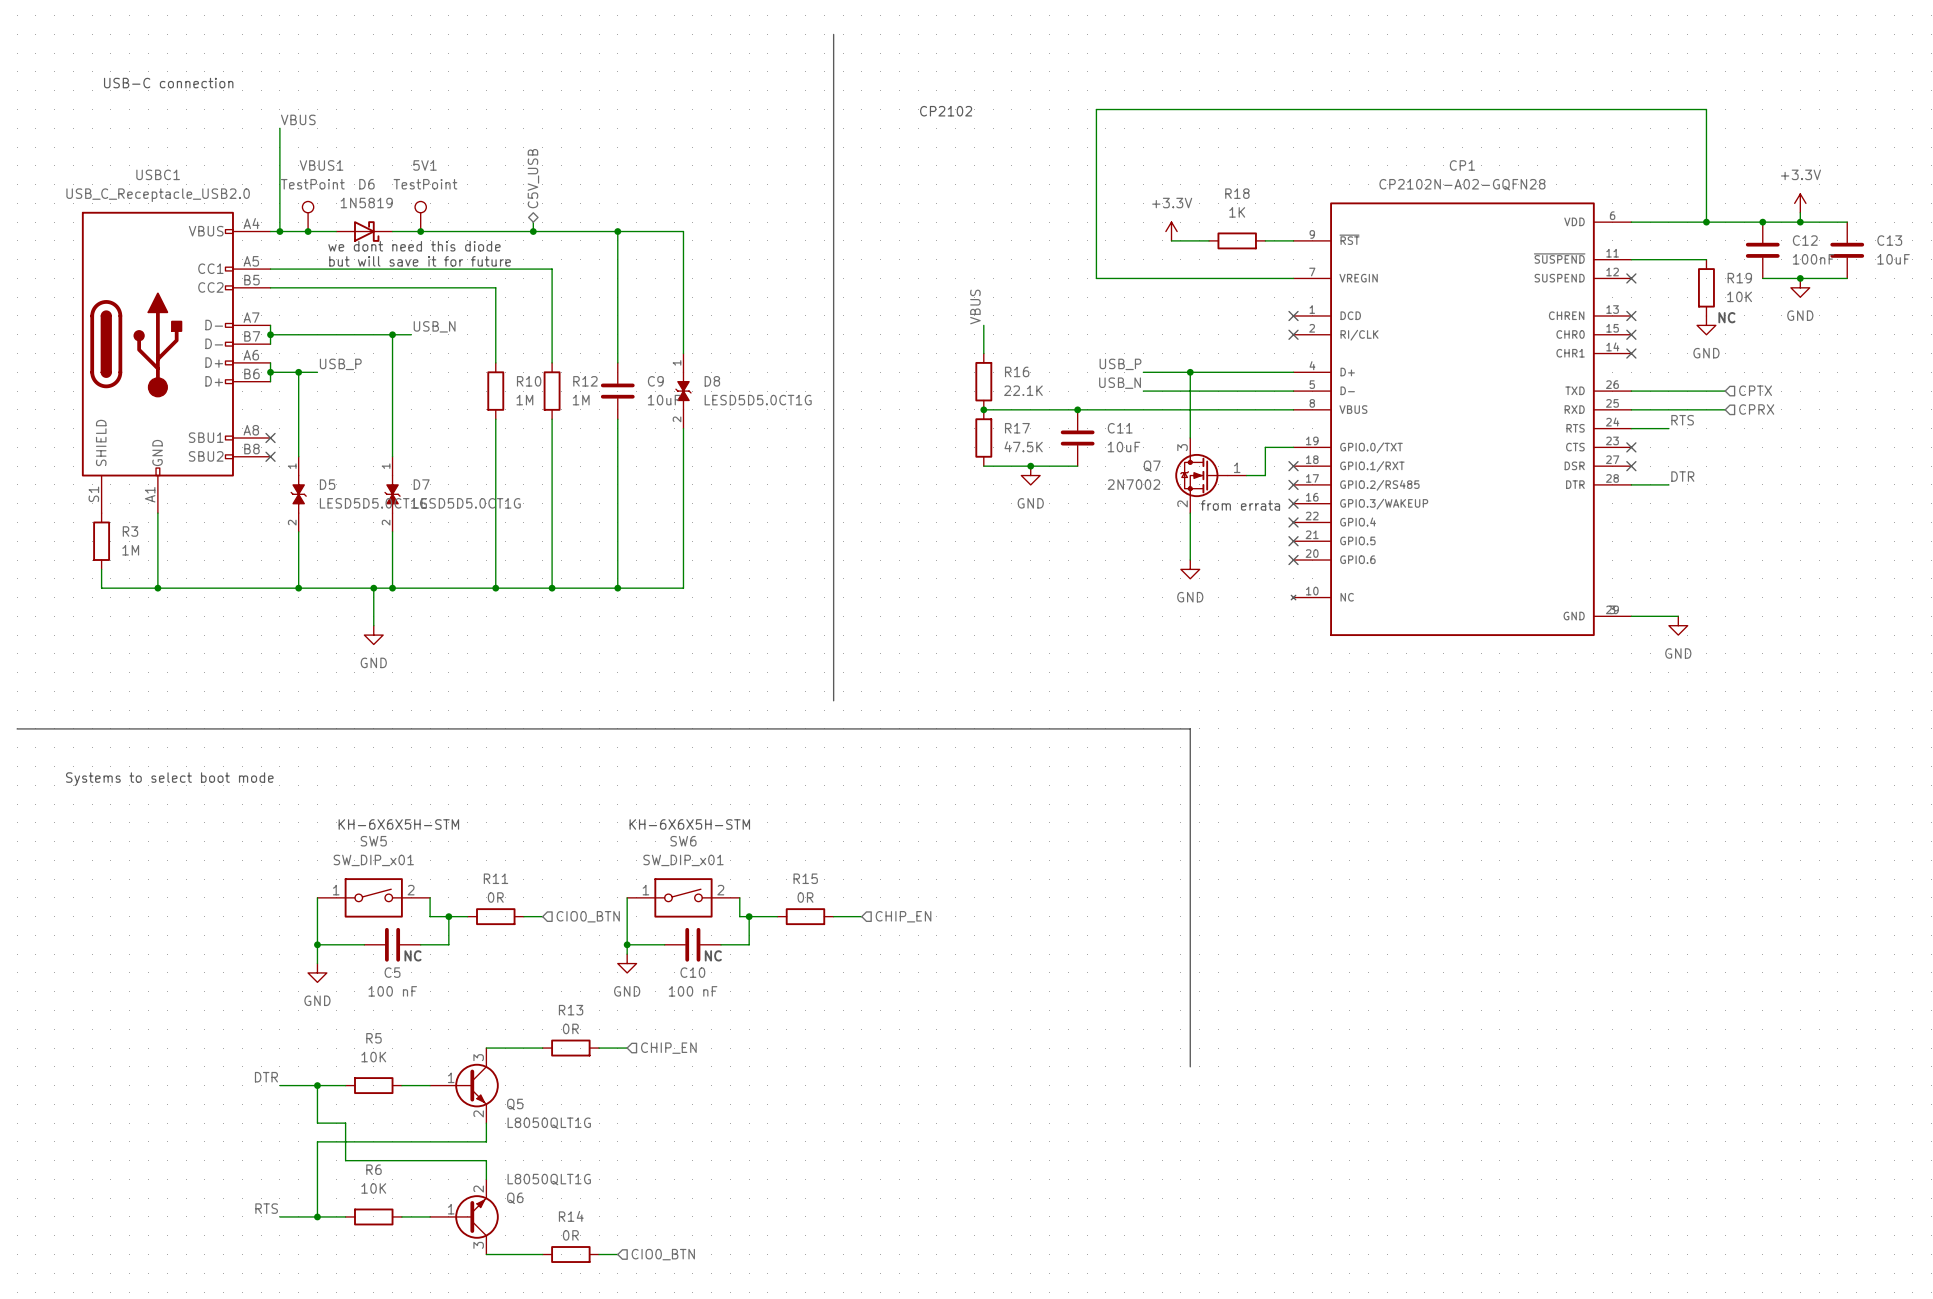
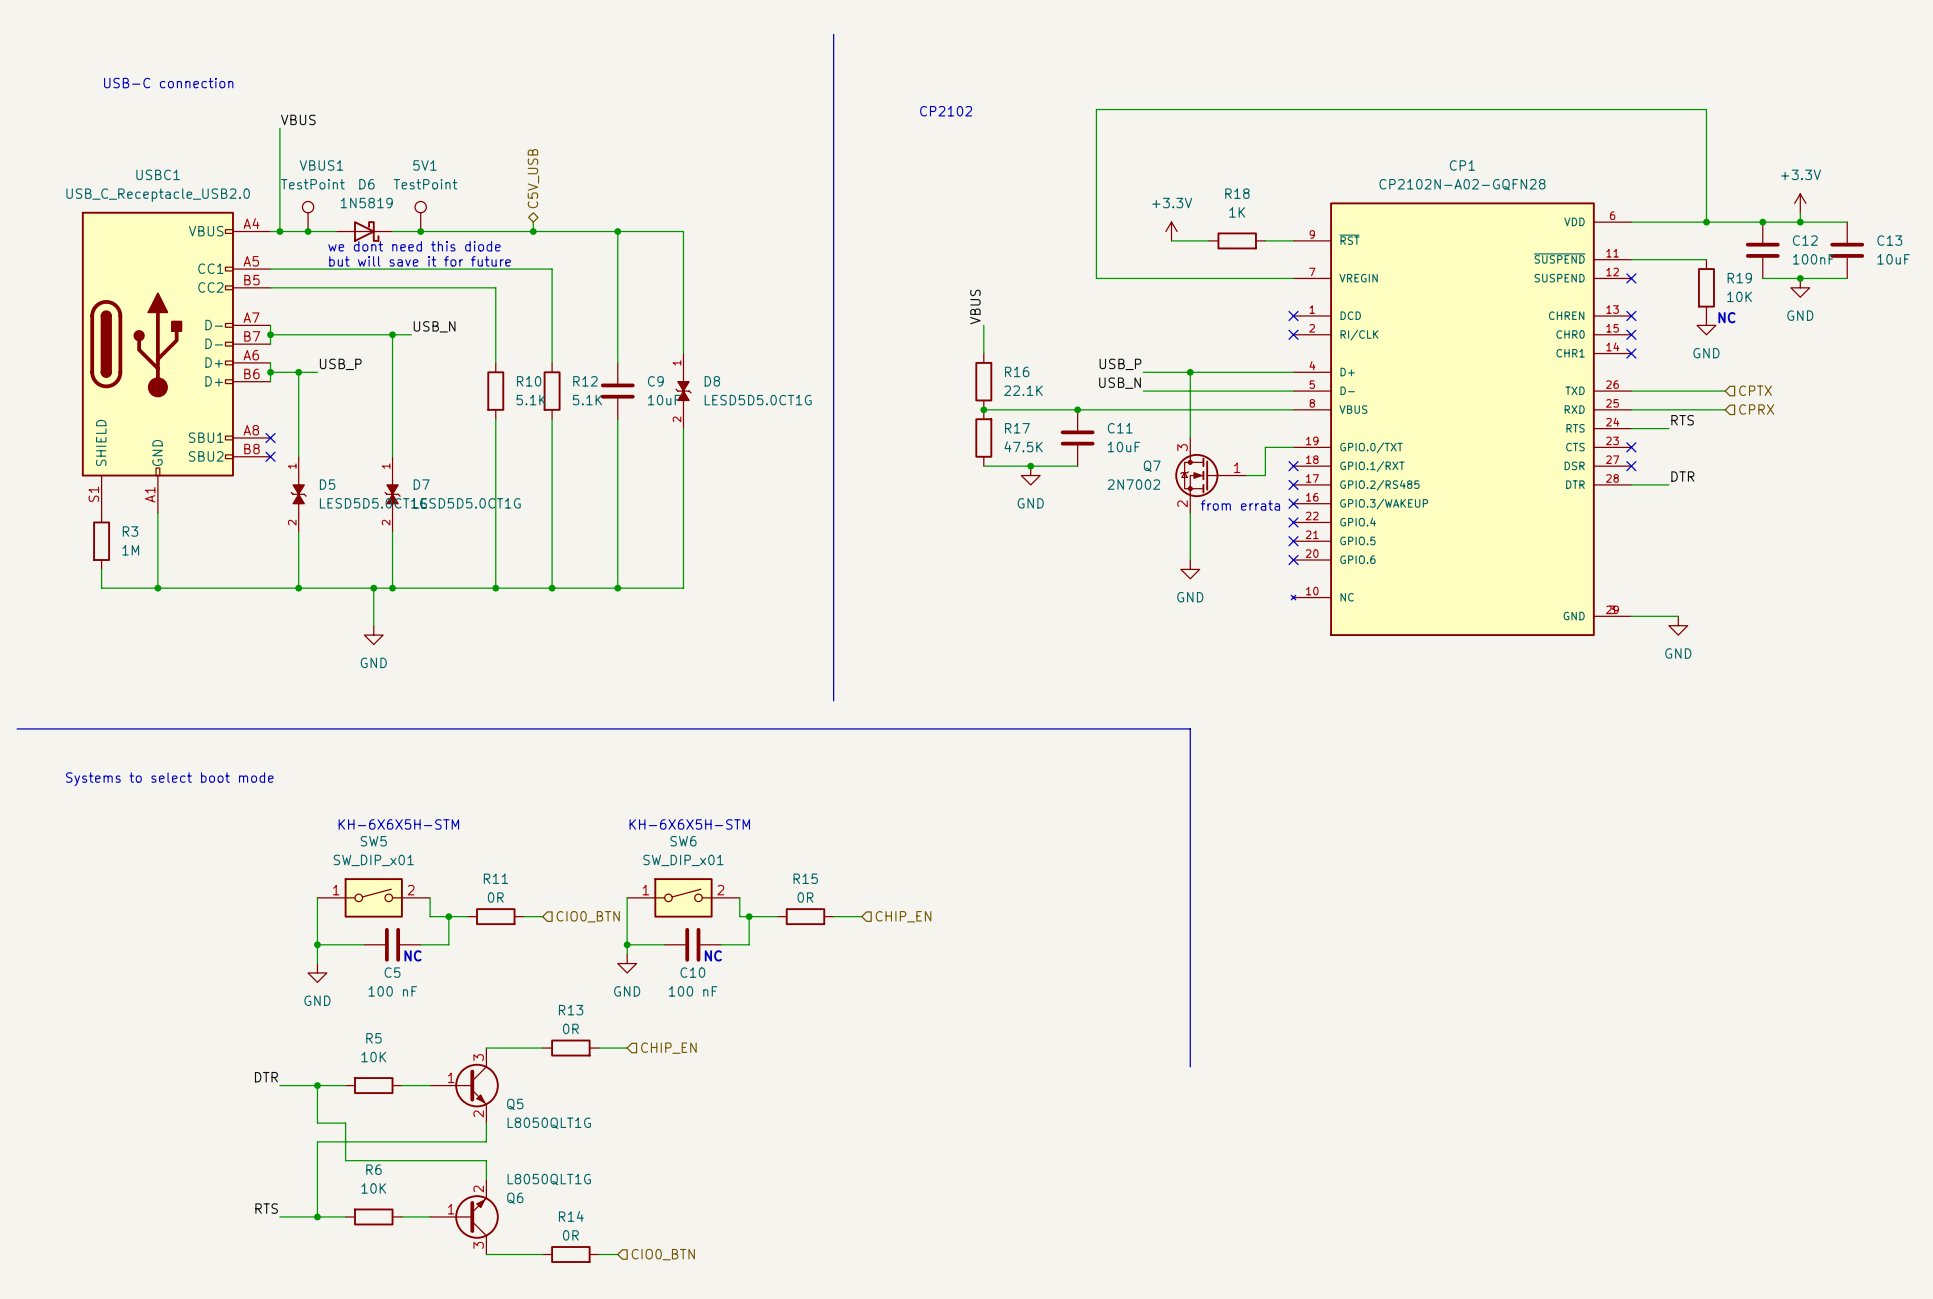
R10 value: 1M (524, 400) -> 5.1K (531, 400)
R12 value: 1M (581, 400) -> 5.1K (587, 400)

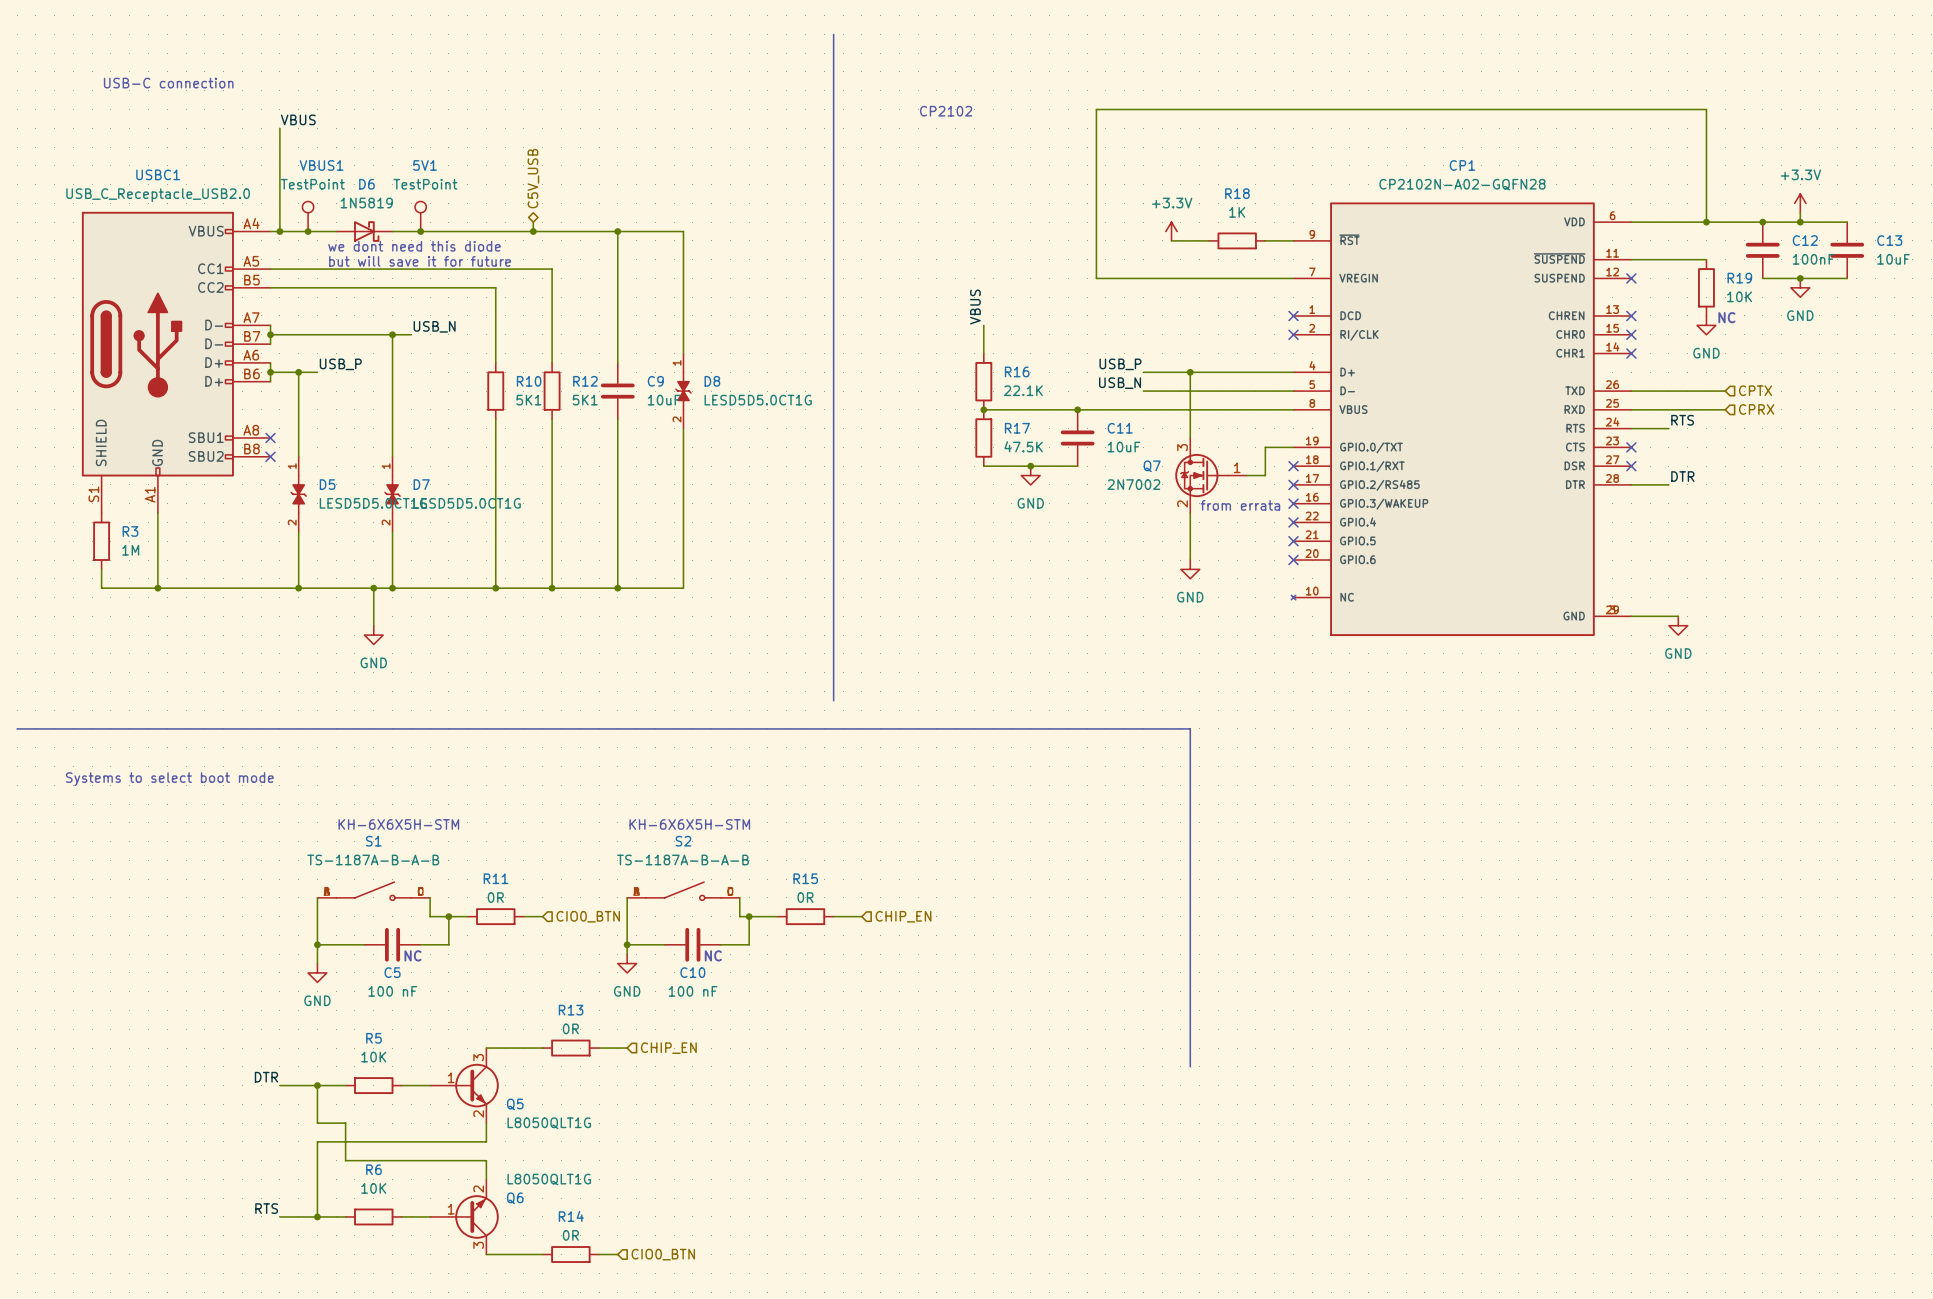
R10 value: 5.1K (531, 400) -> 5K1 (528, 400)
R12 value: 5.1K (587, 400) -> 5K1 (585, 400)
S1: none -> TS-1187A-B-A-B (373, 891)
S2: none -> TS-1187A-B-A-B (683, 891)
SW5: SW_DIP_x01 (373, 897) -> none
SW6: SW_DIP_x01 (683, 897) -> none

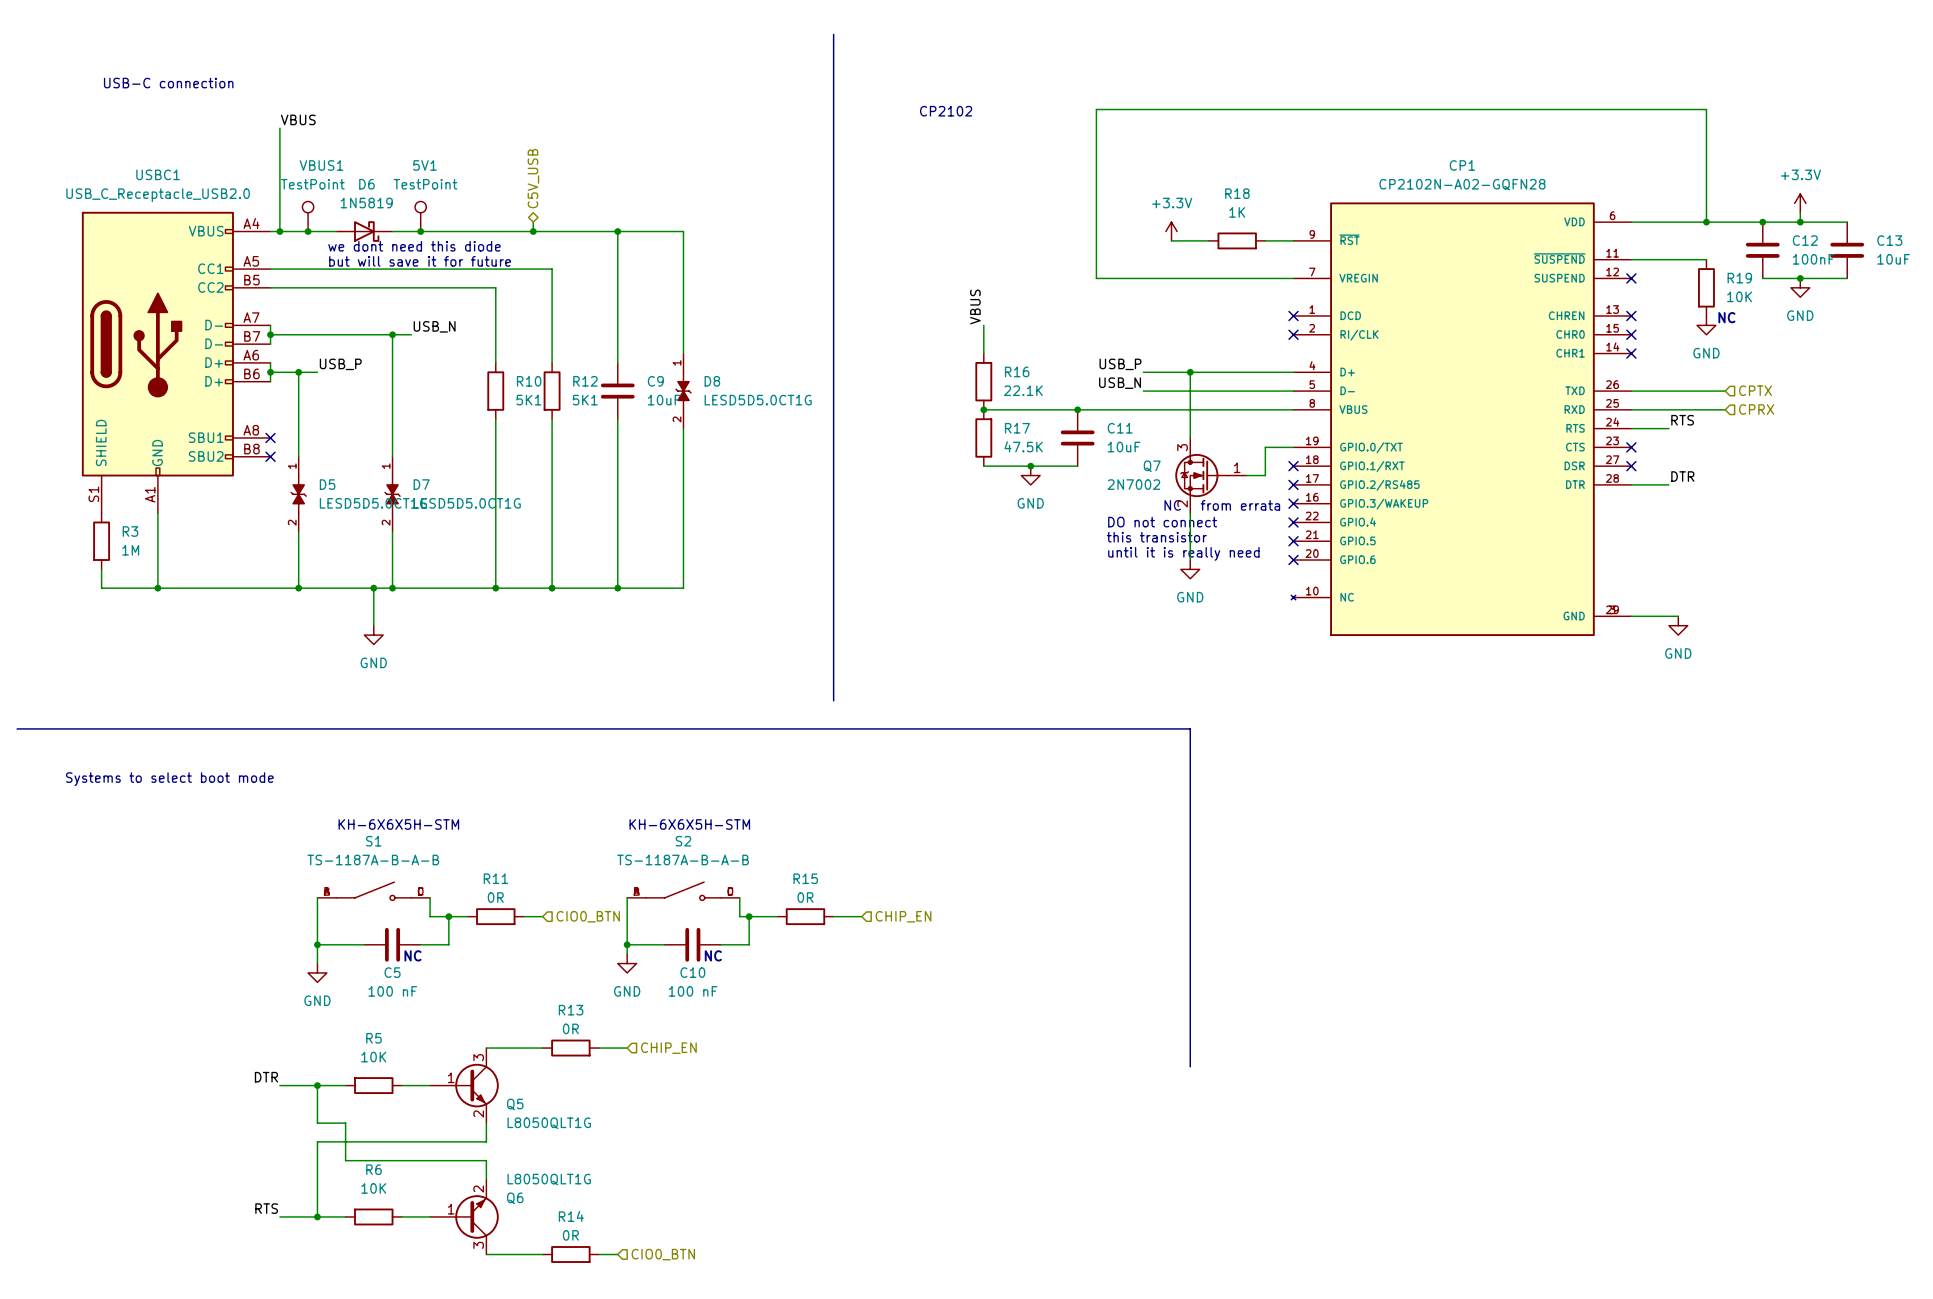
text: none -> NC (1172, 505)
text: none -> DO not connect (1162, 522)
text: none -> this transistor (1156, 537)
text: none -> until it is really need (1183, 553)

